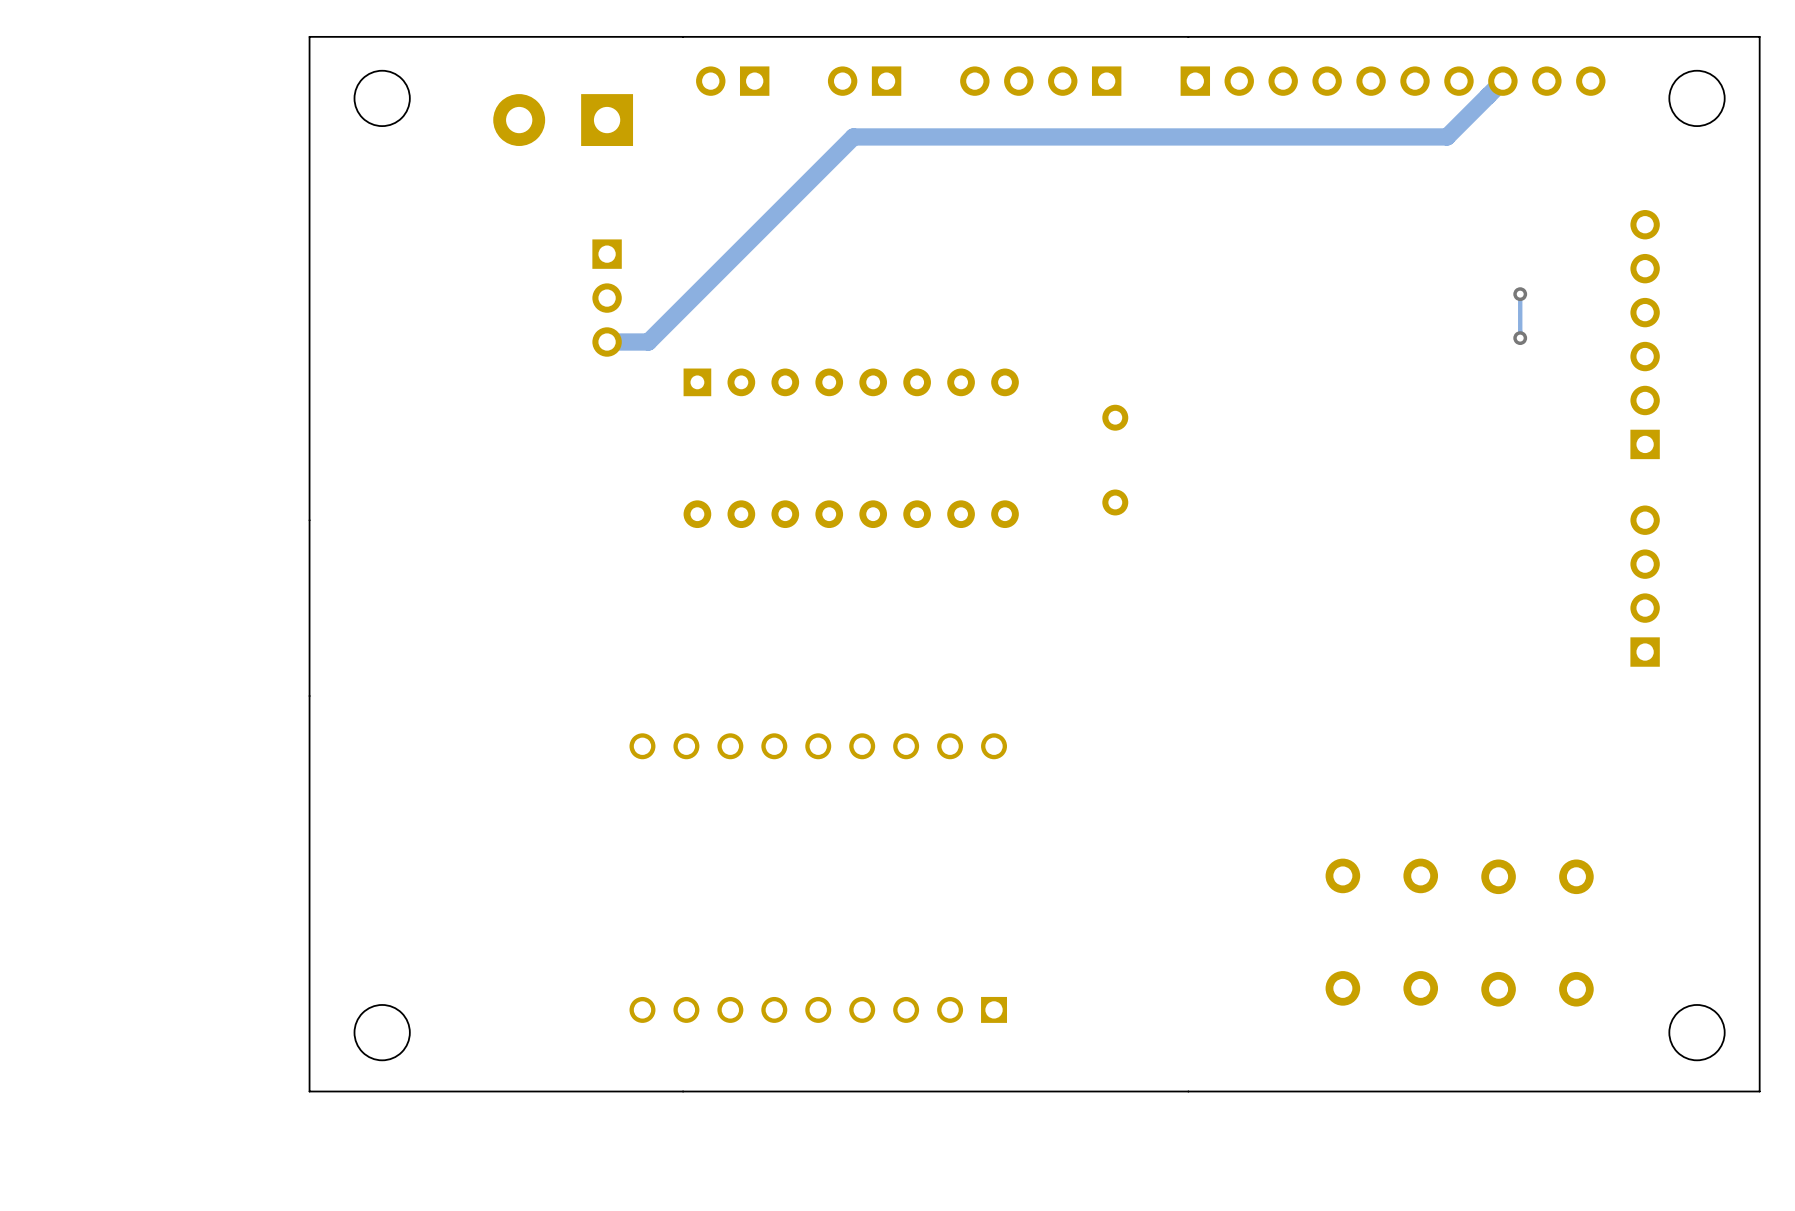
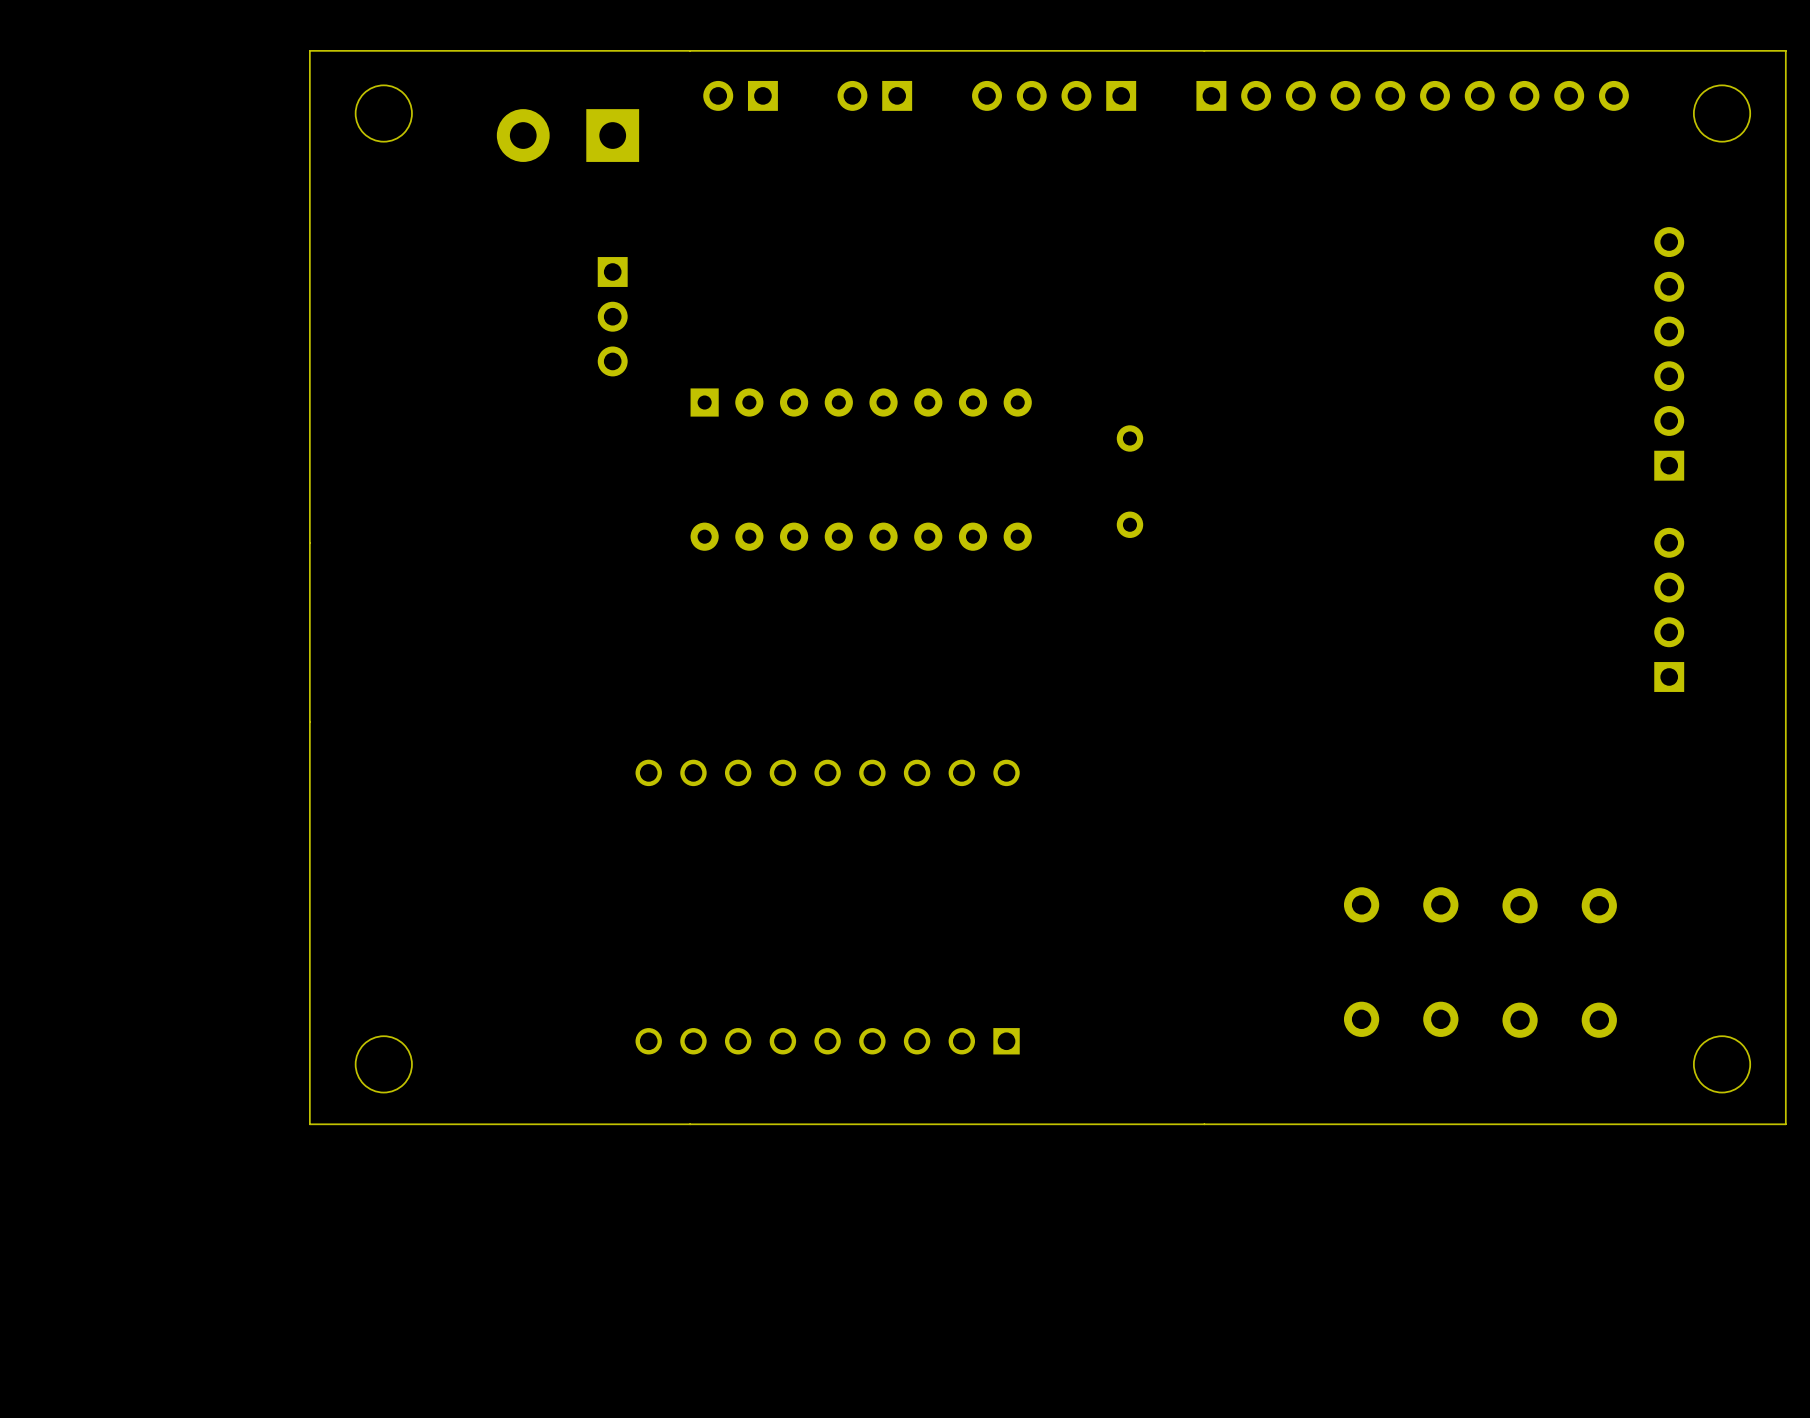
track: (1502, 81) (1447, 136) (853, 136) (648, 342) (607, 342) -> none
track: (1520, 294) (1520, 338) -> none
via: (1520, 294) -> none
via: (1520, 338) -> none

